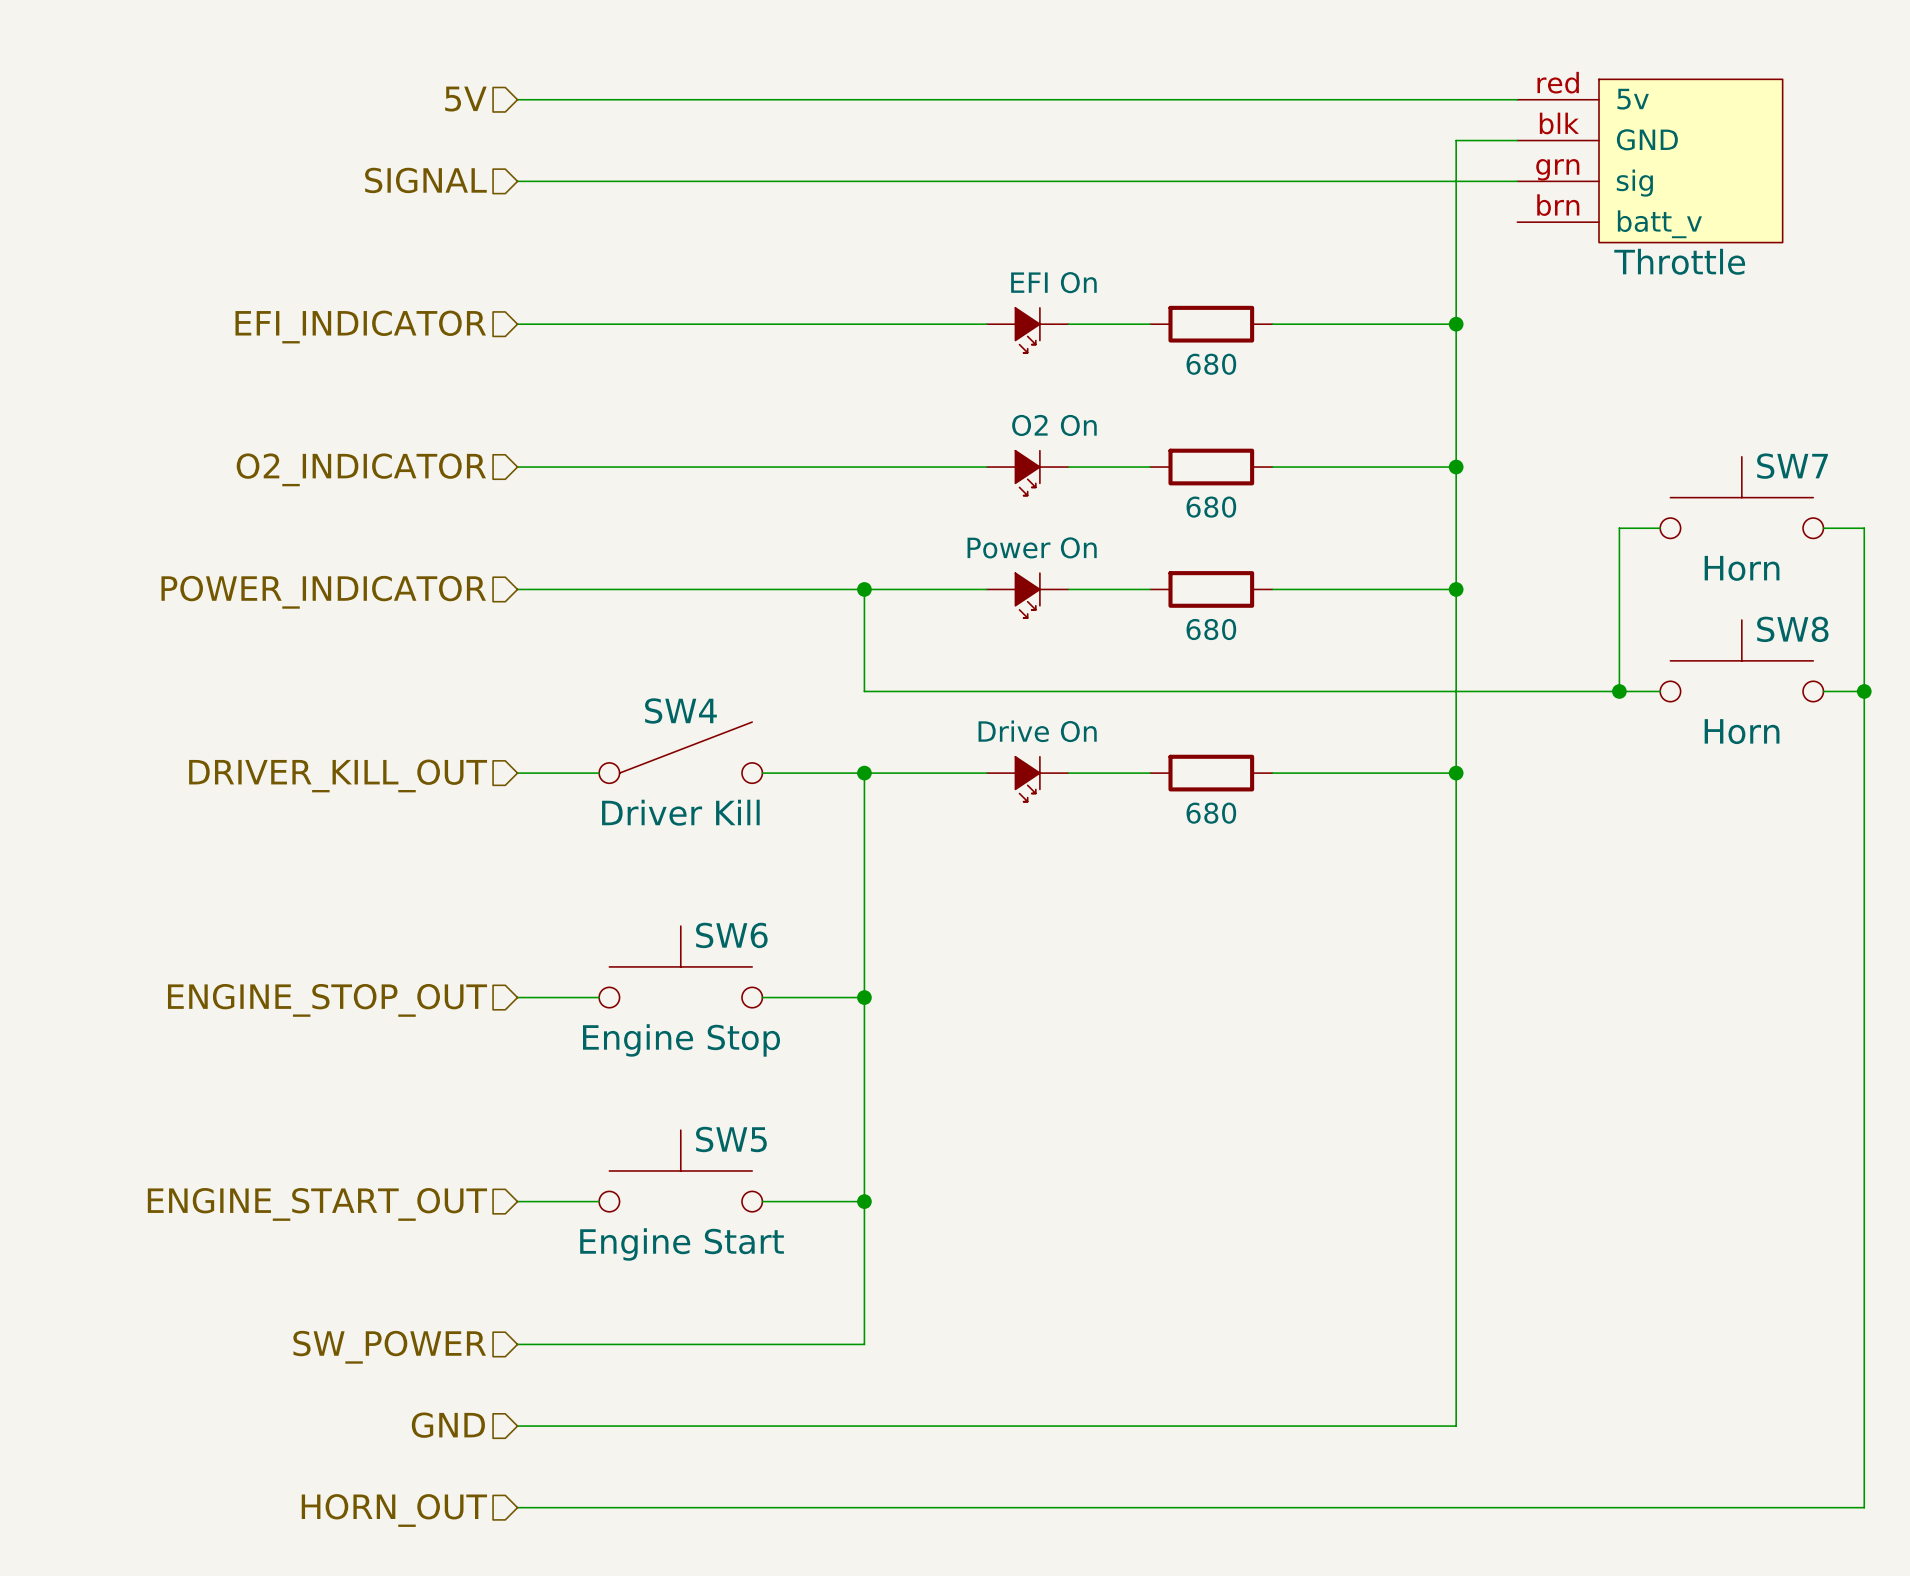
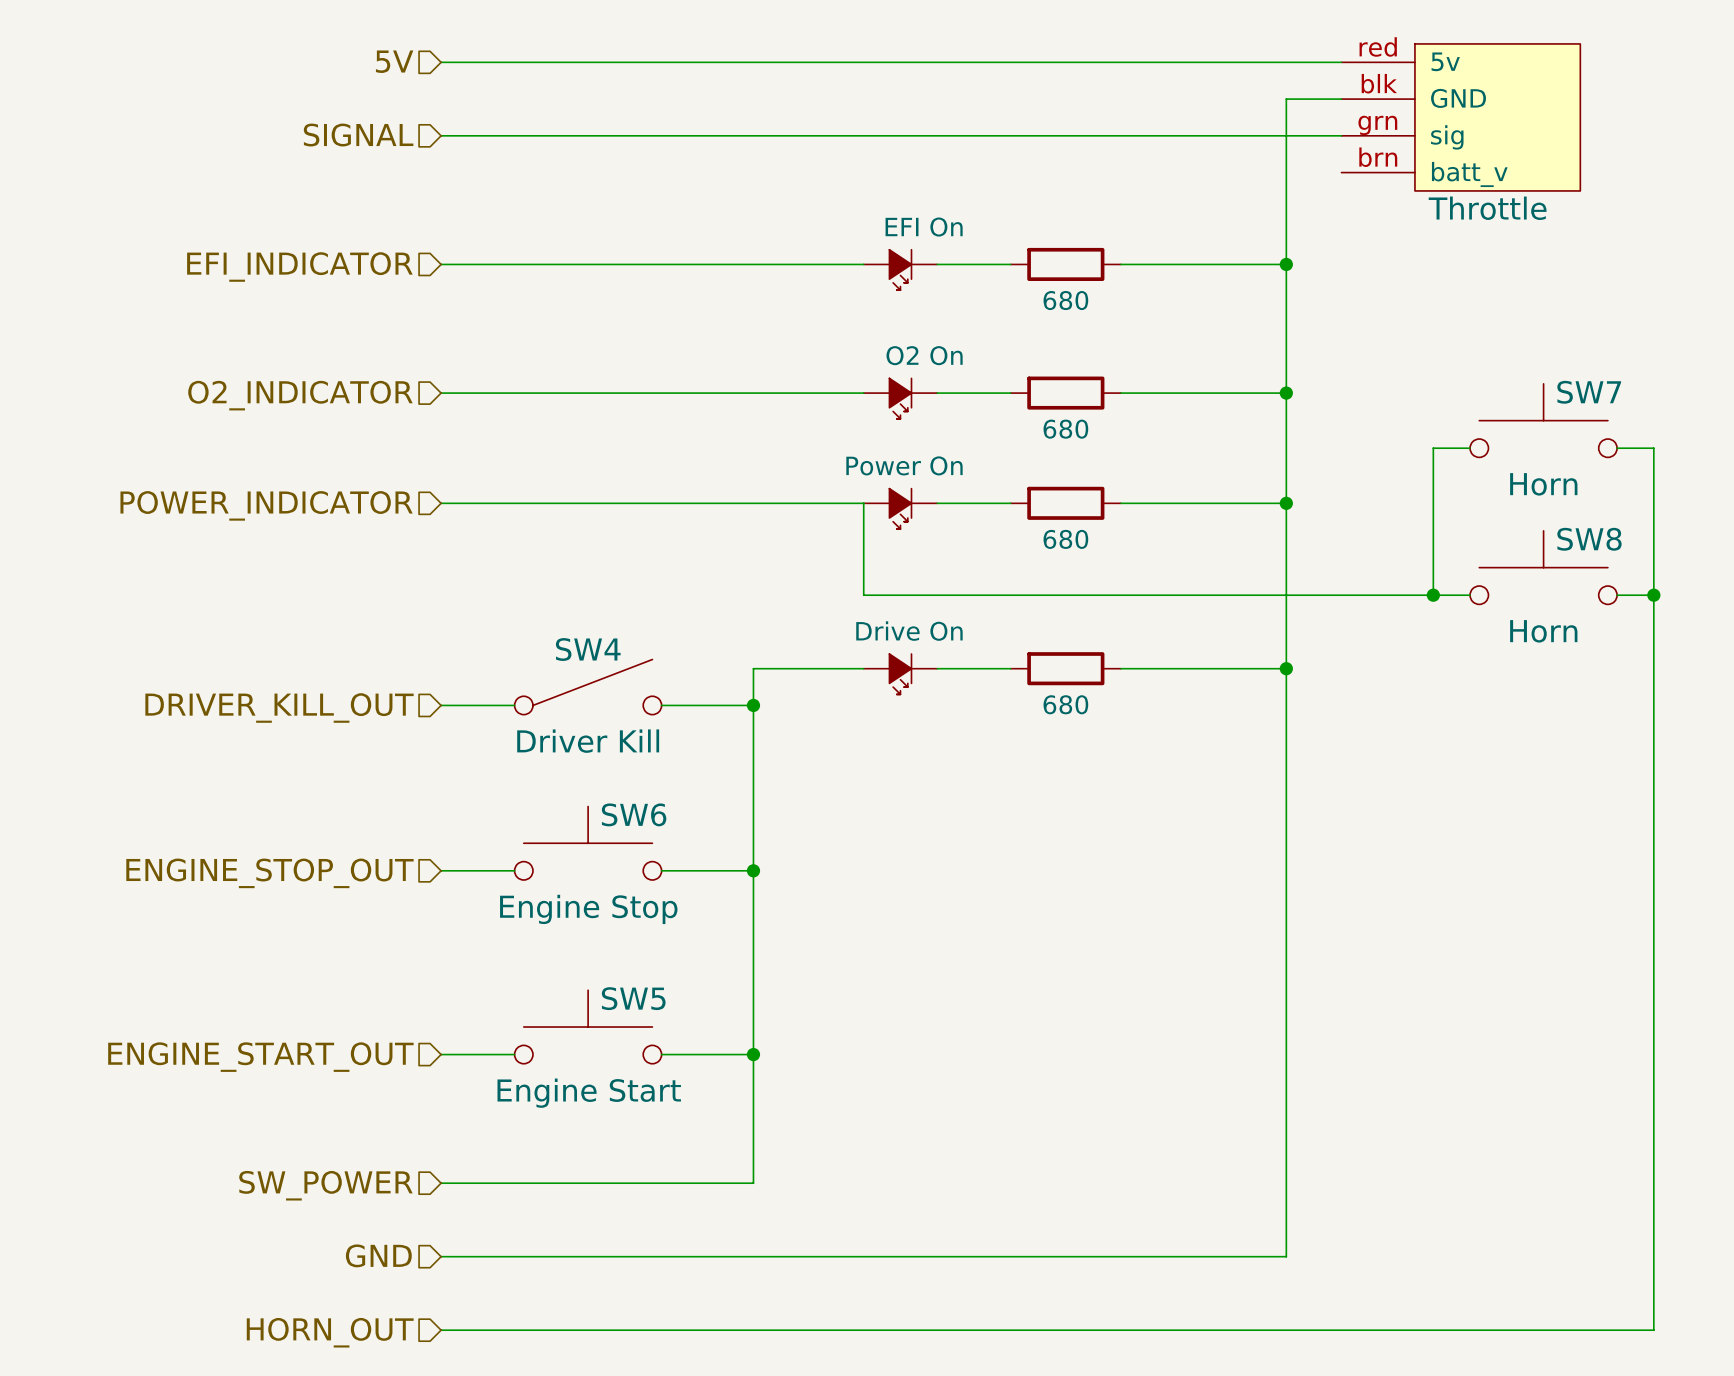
wire: (864, 589) (864, 691) (986, 691) -> (863, 503) (863, 595)
junction: (864, 589) -> none
SW4 position: (680, 752) -> (588, 687)
wire: (517, 773) (599, 773) -> (441, 705) (514, 705)
wire: (762, 773) (864, 773) -> (661, 705) (753, 705)
junction position: (864, 773) -> (753, 705)
hierarchical label position: DRIVER_KILL_OUT (338, 775) -> DRIVER_KILL_OUT (279, 707)

